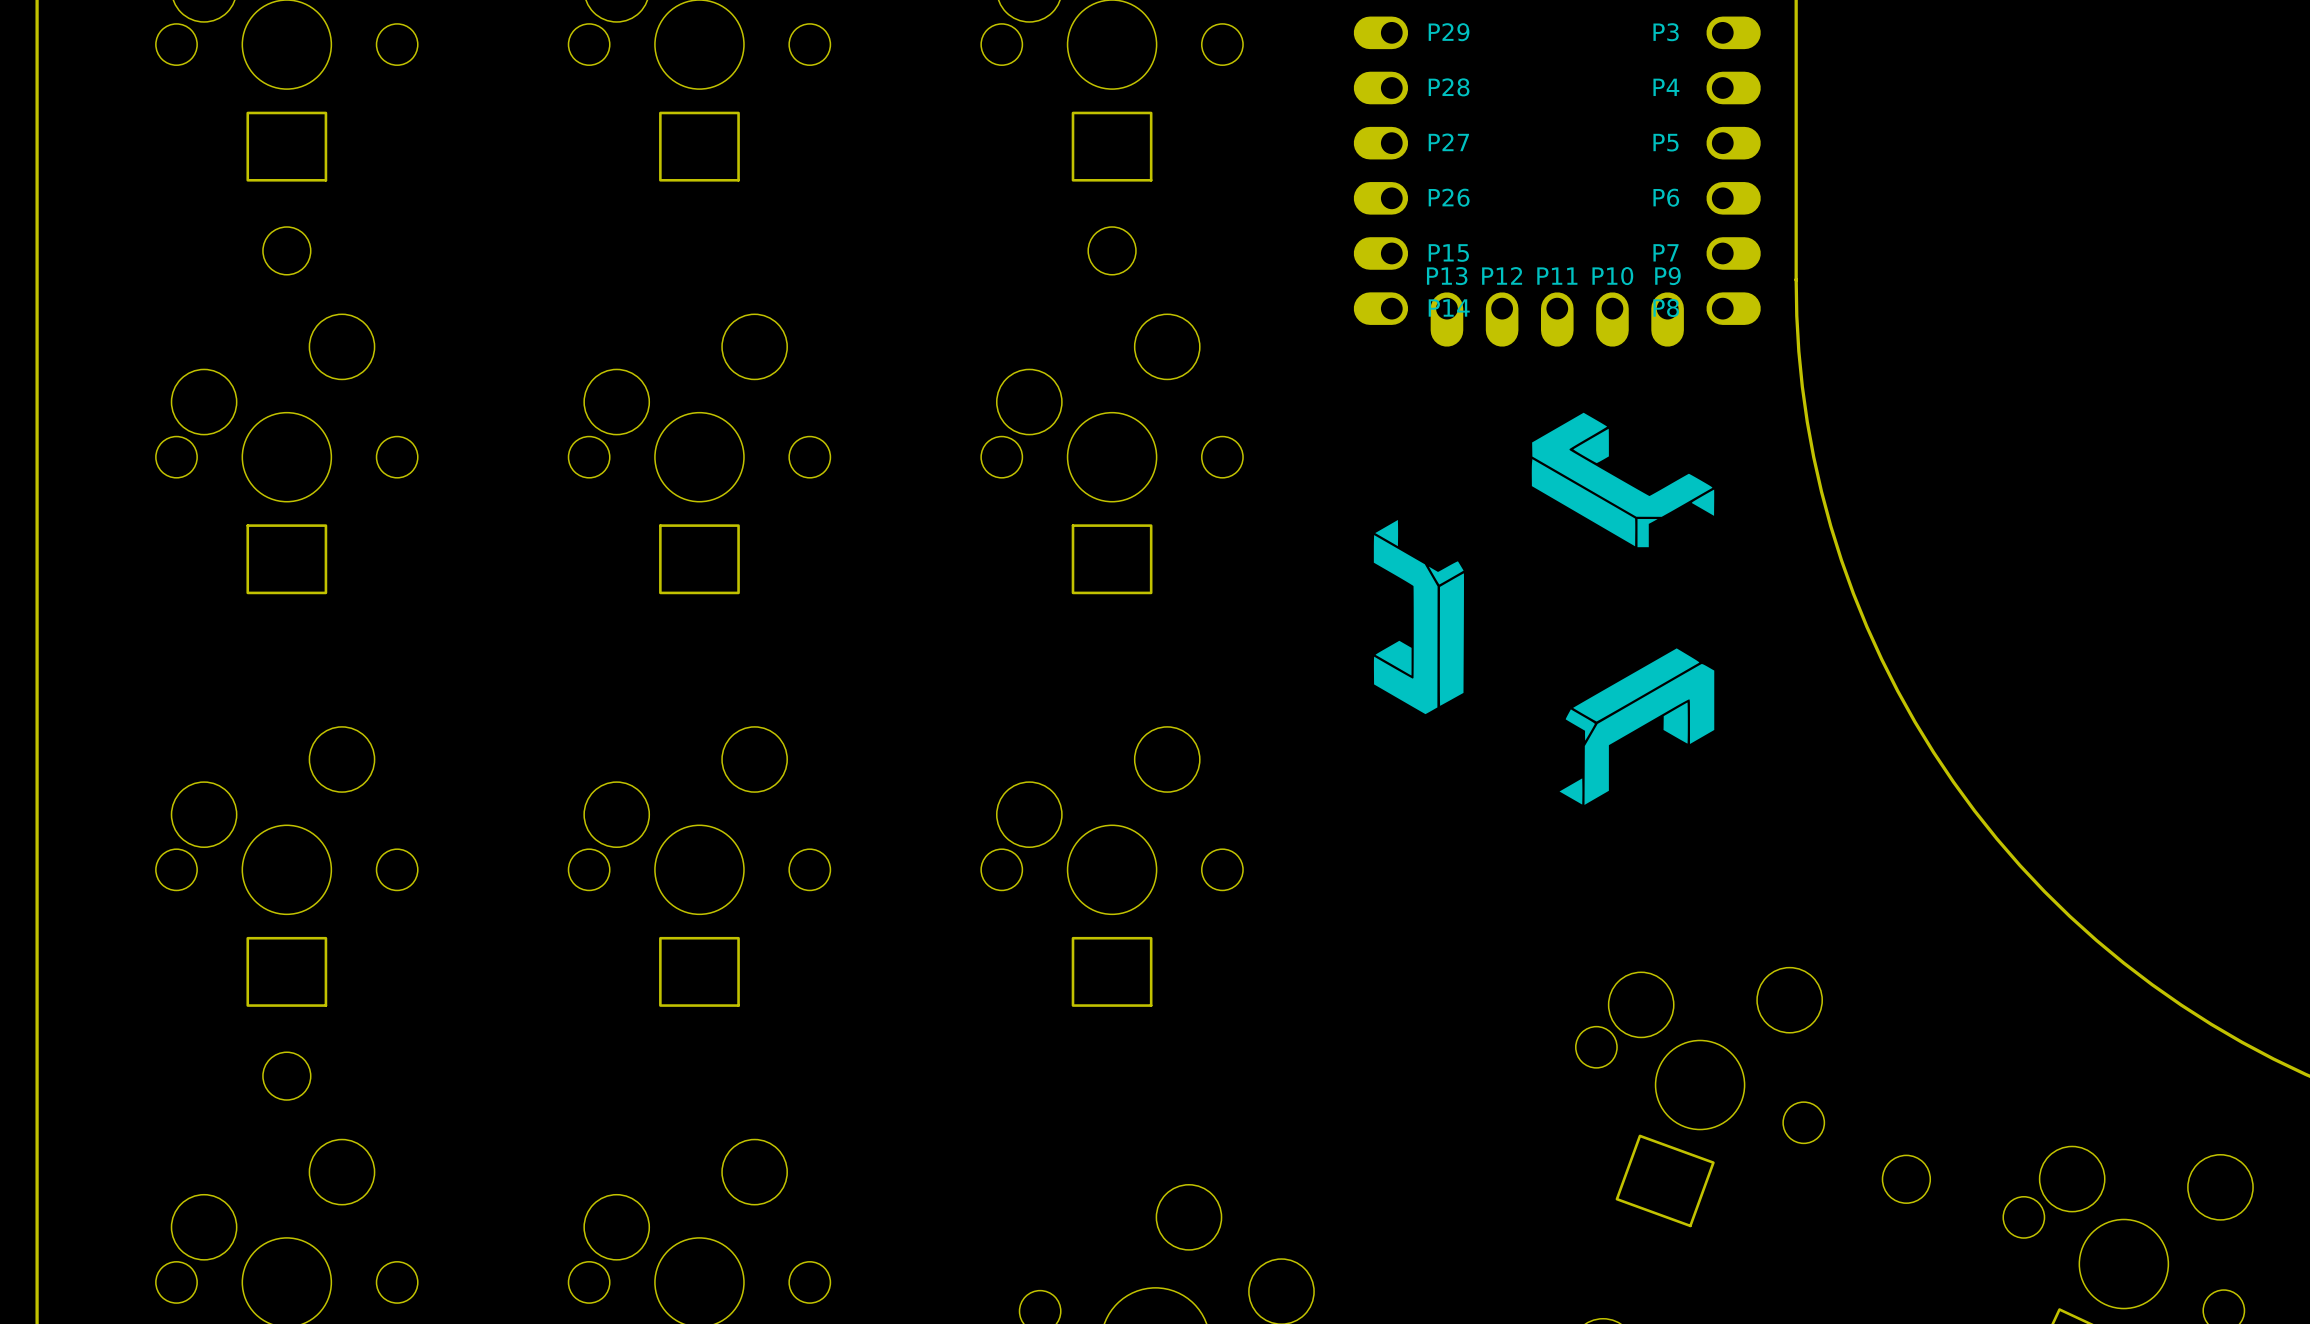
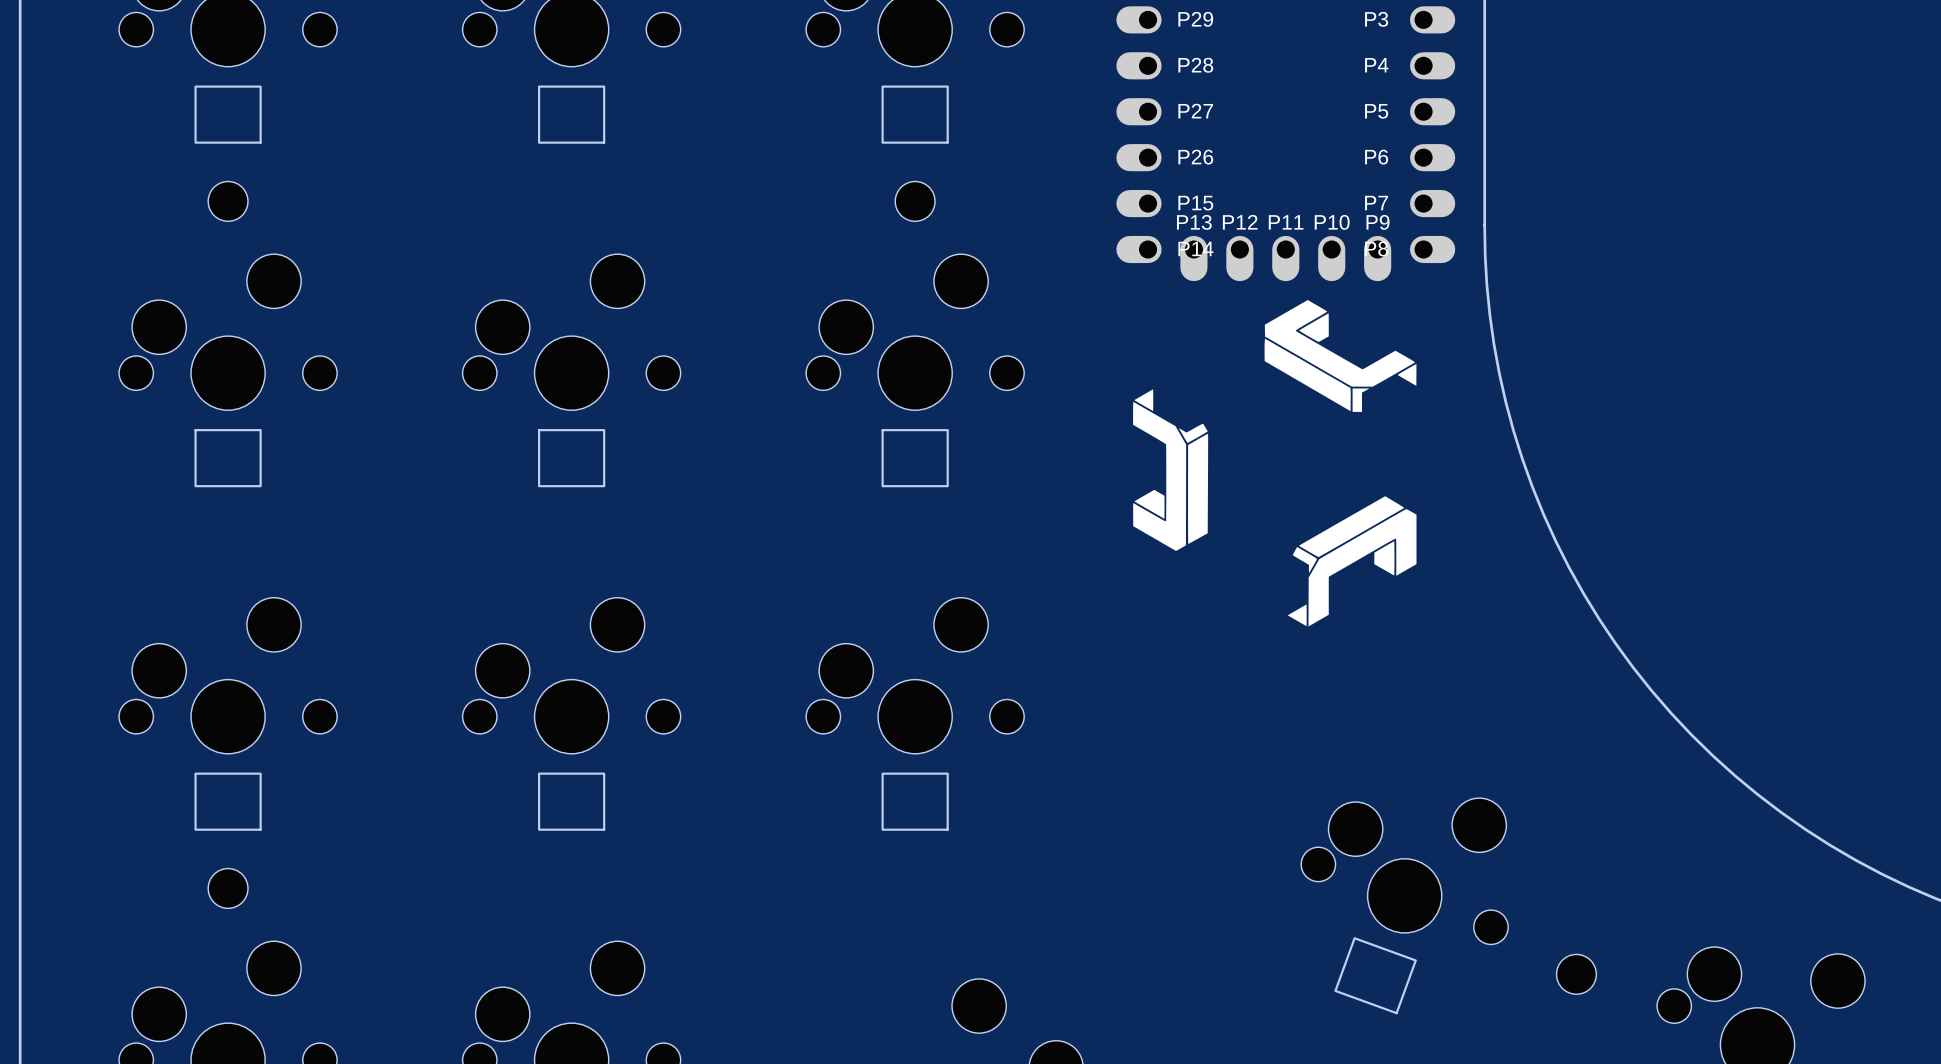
drawing position: (1544, 608) -> (1274, 463)

